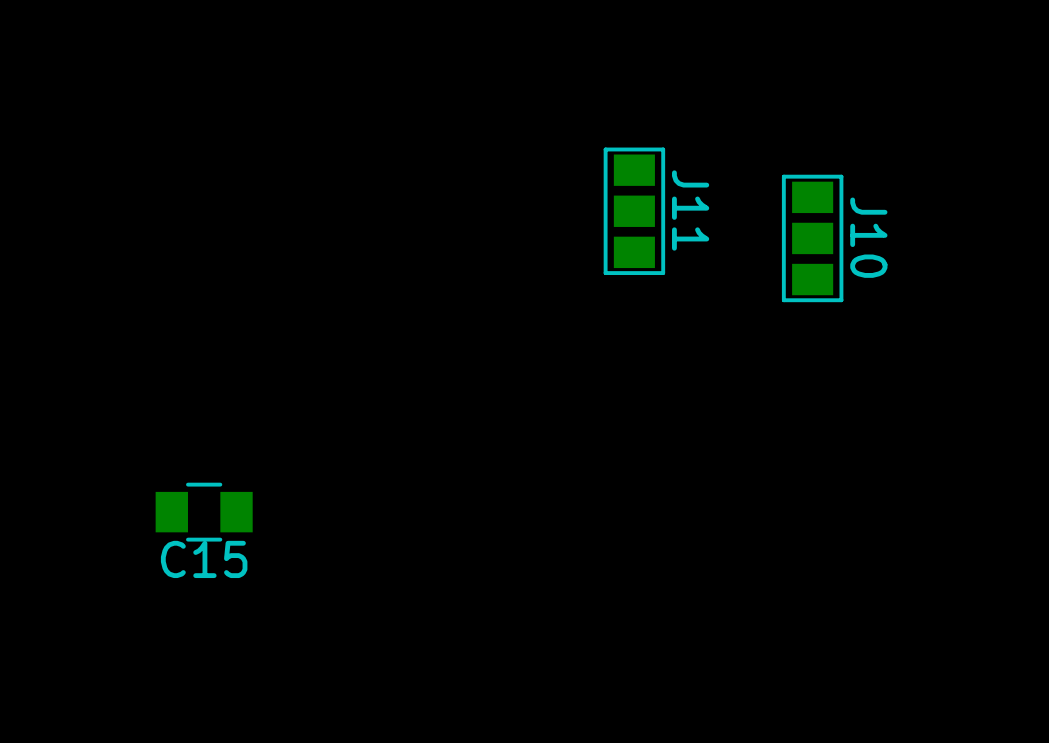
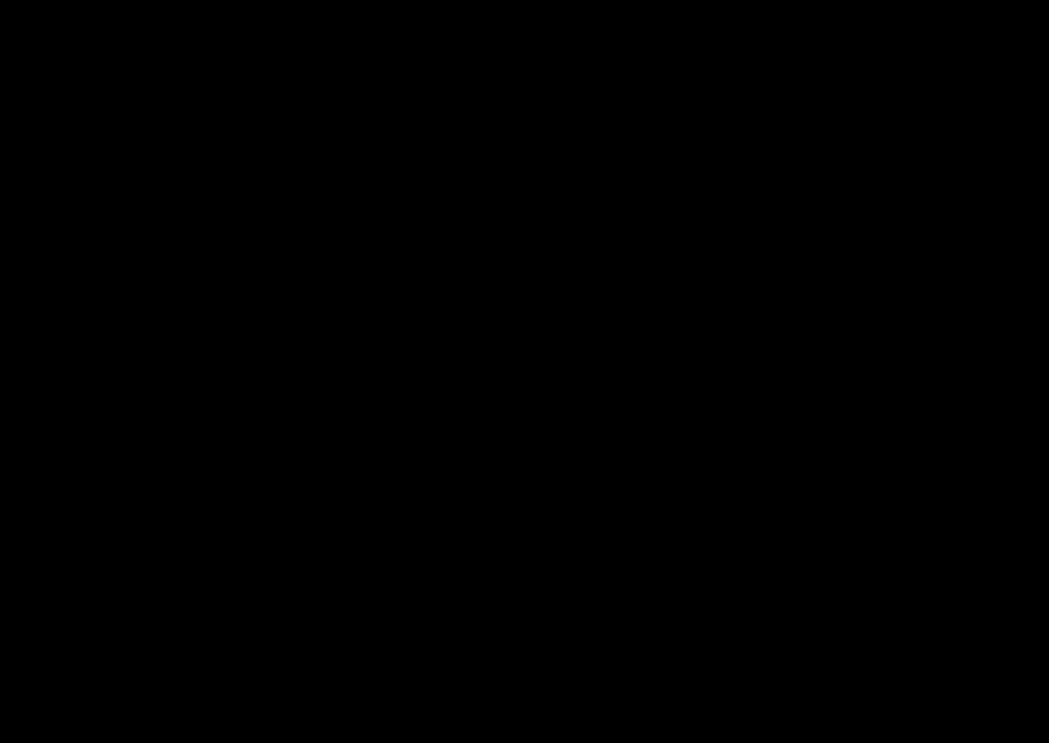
J11: (634, 211) -> none
J10: (812, 238) -> none
C15: (204, 512) -> none

